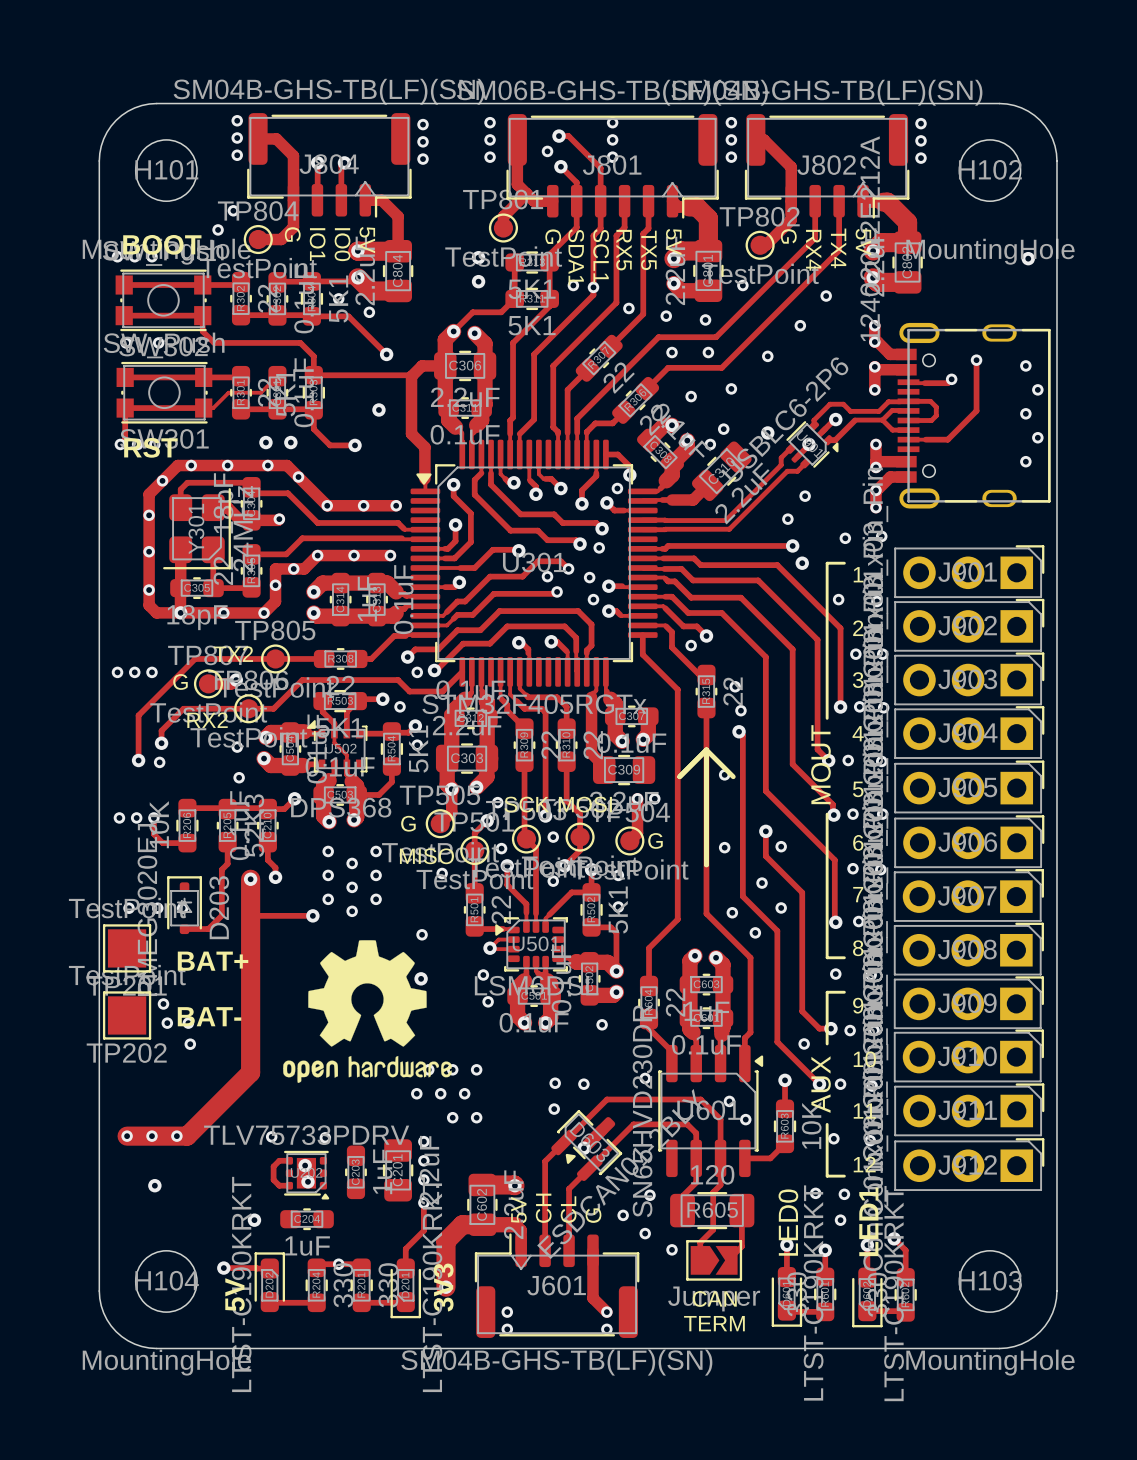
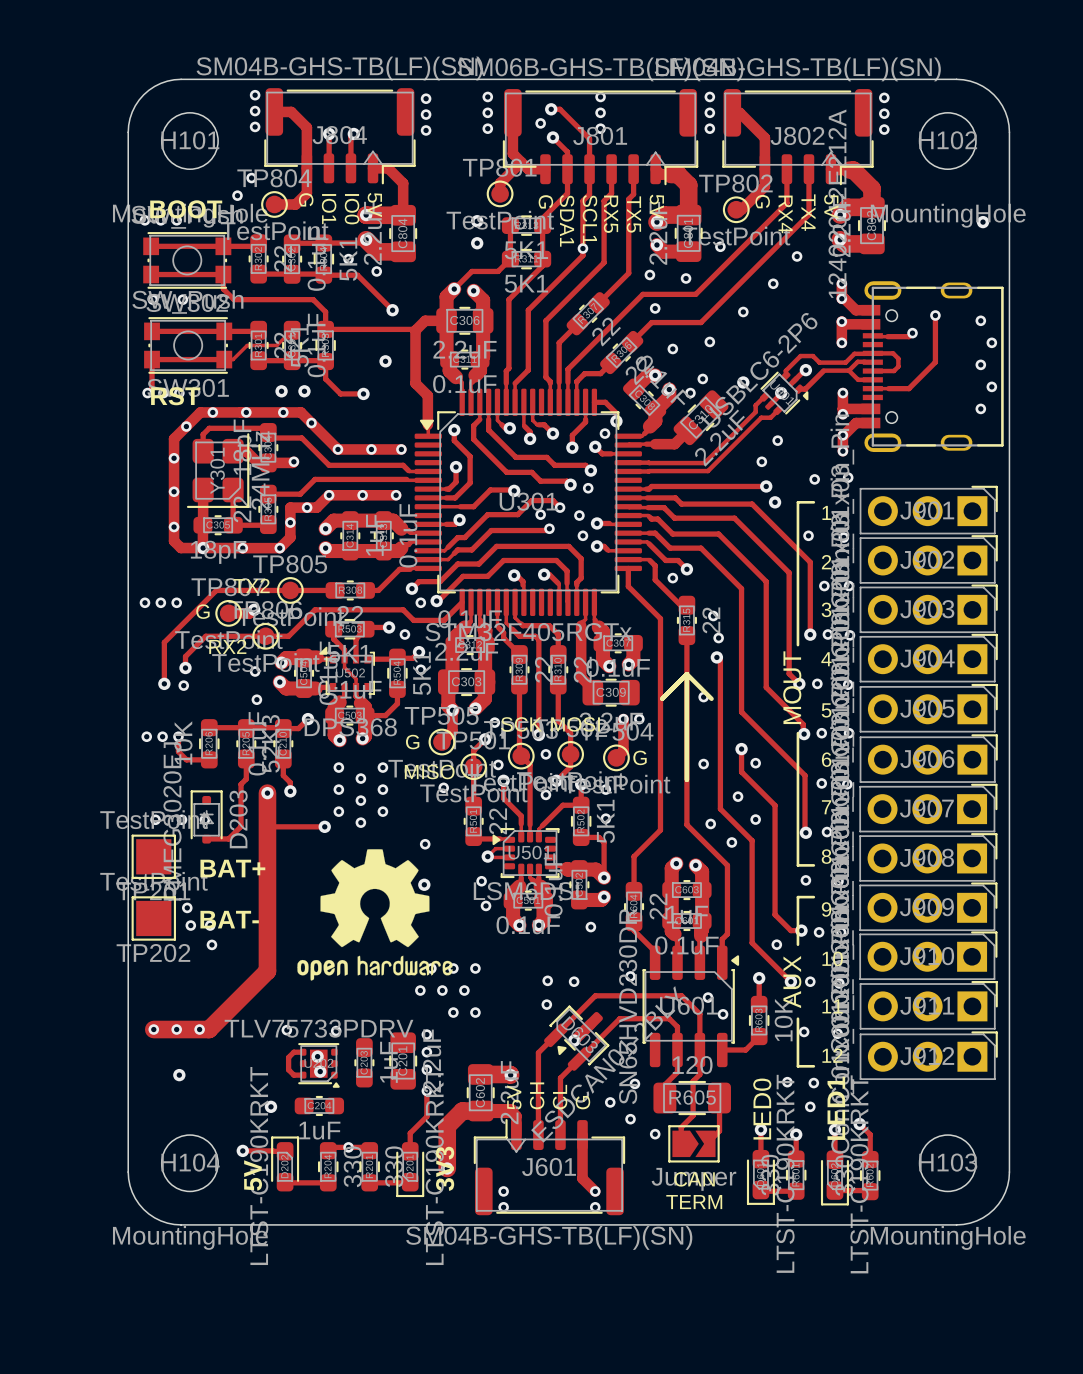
via: (573, 285) -> none
via: (628, 308) -> none
via: (708, 352) -> none

